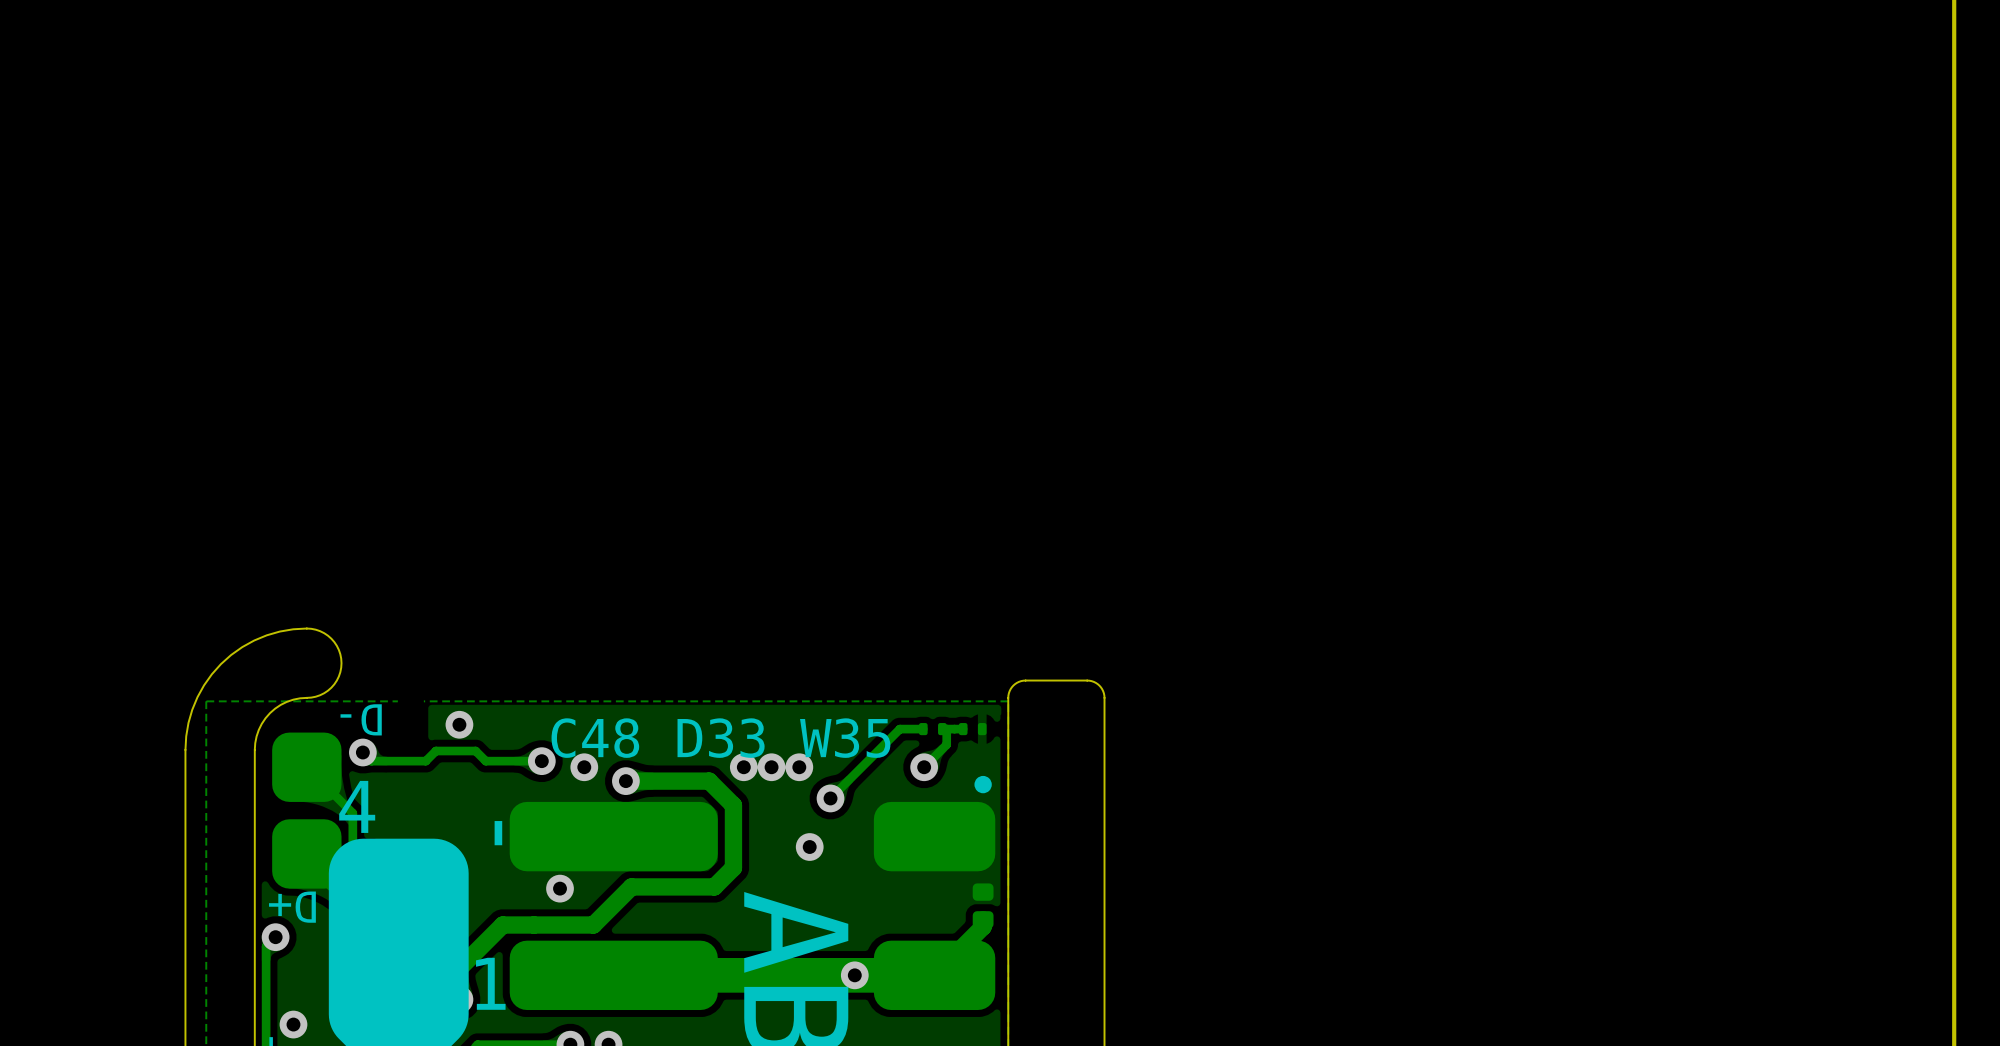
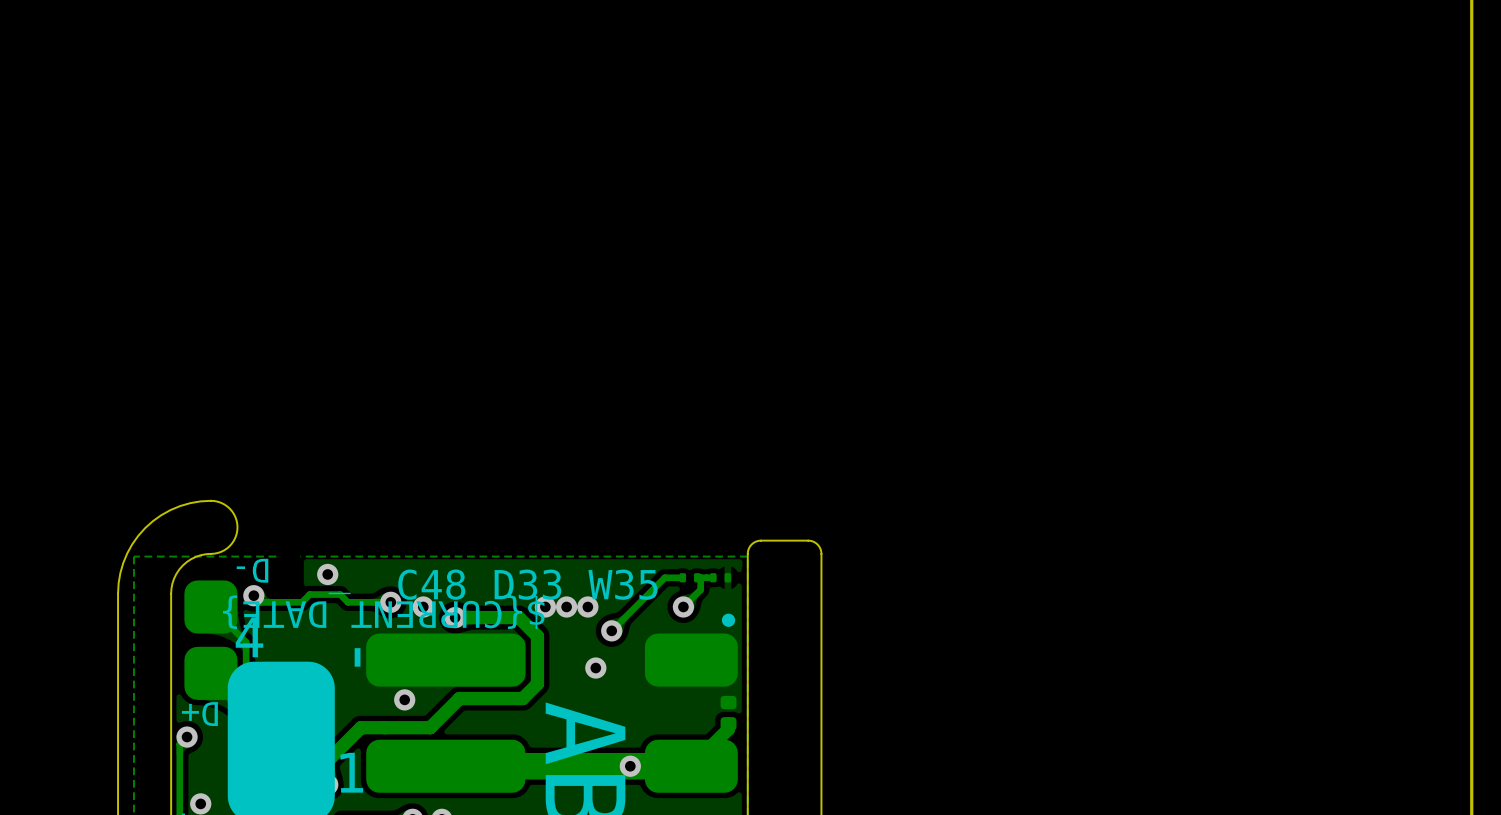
text: none -> ${CURRENT_DATE} (383, 610)

